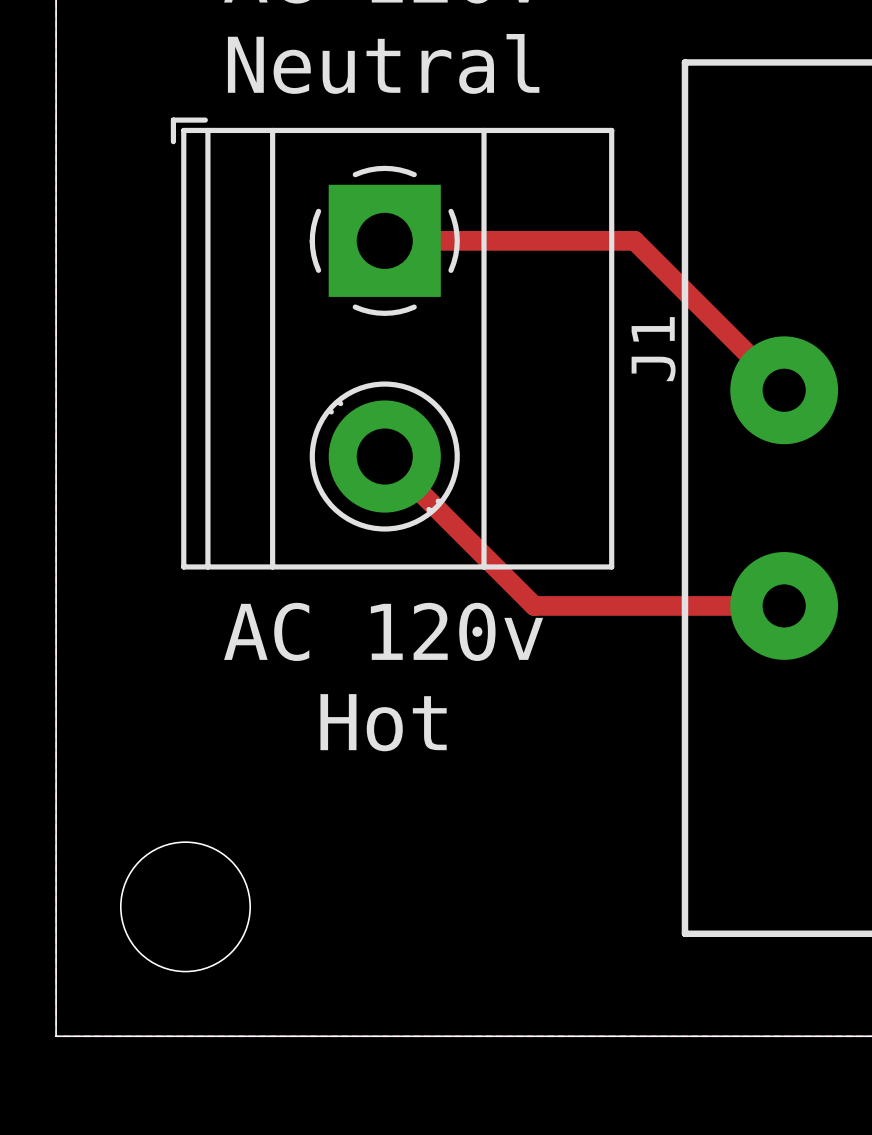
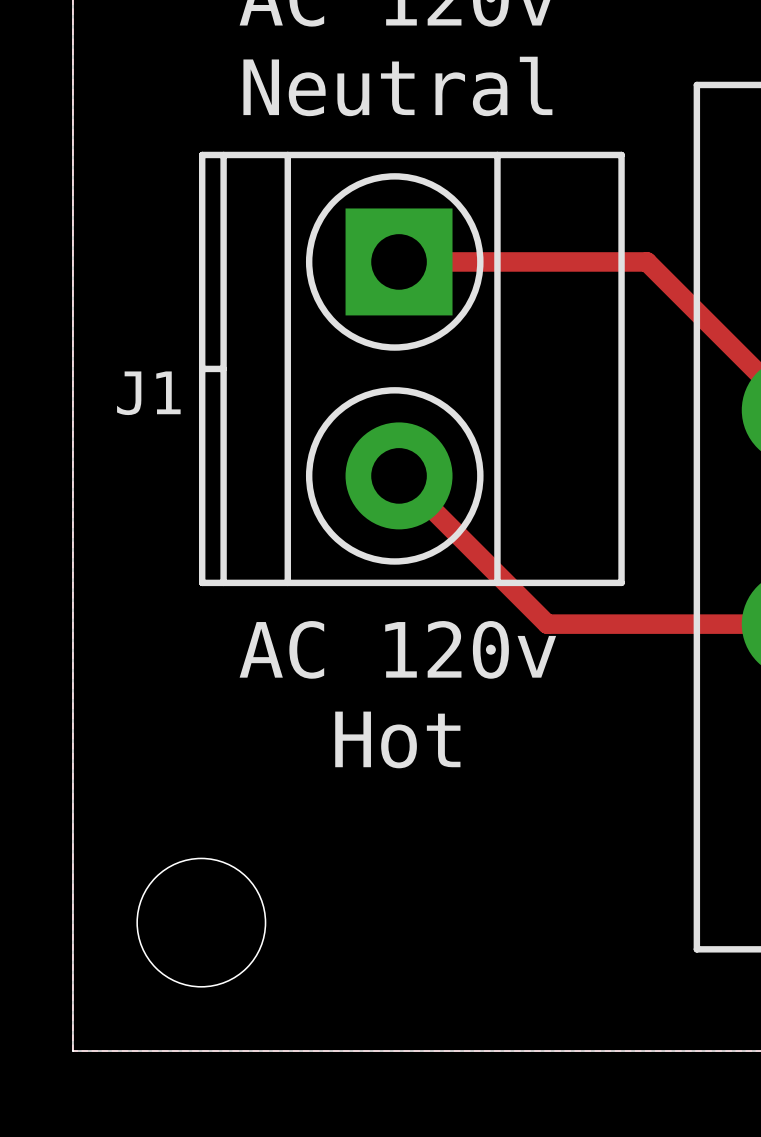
J1 footprint: [170, 117, 615, 570] -> [198, 151, 625, 587]
J1 name rotation: 0° (653, 349) -> 90° clockwise (148, 393)
J1 name position: J1 (653, 349) -> J1 (148, 393)

